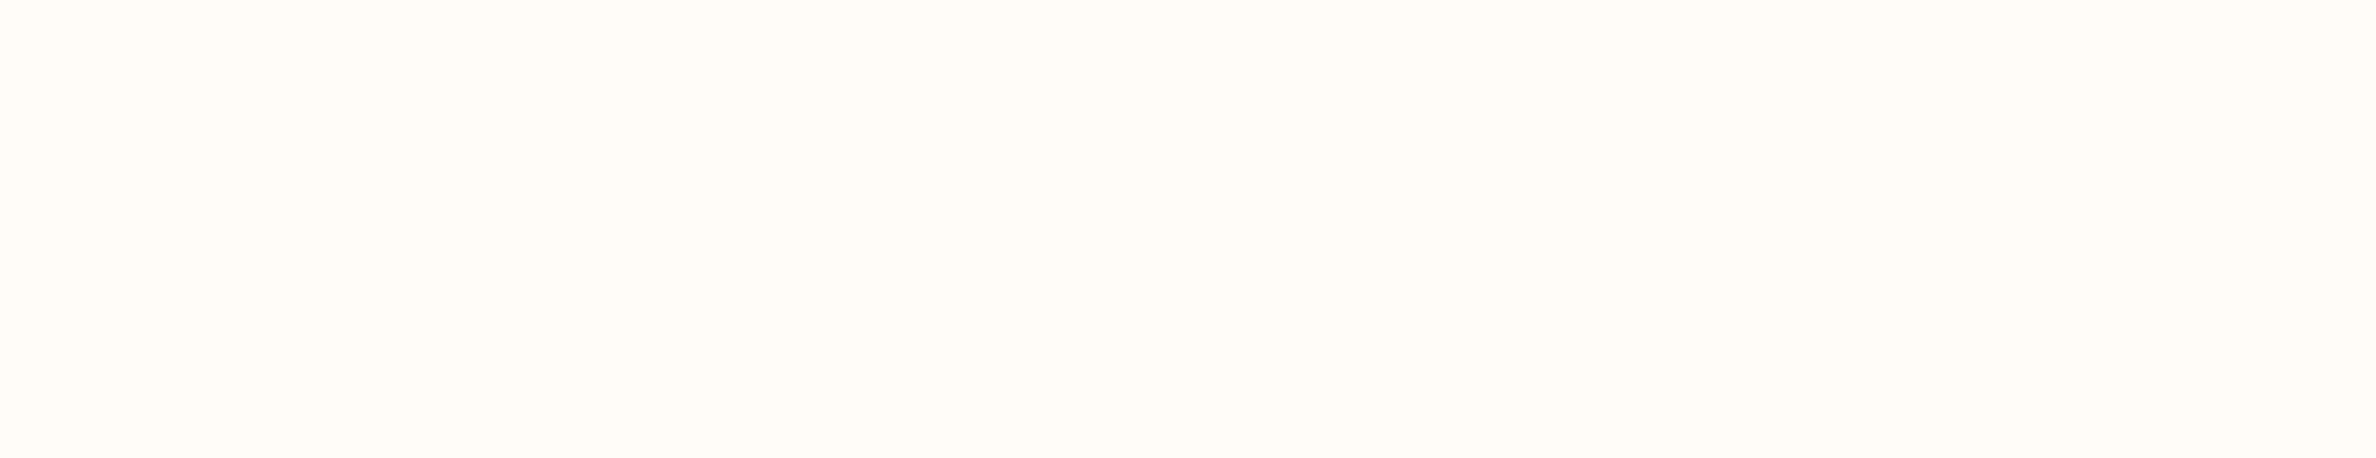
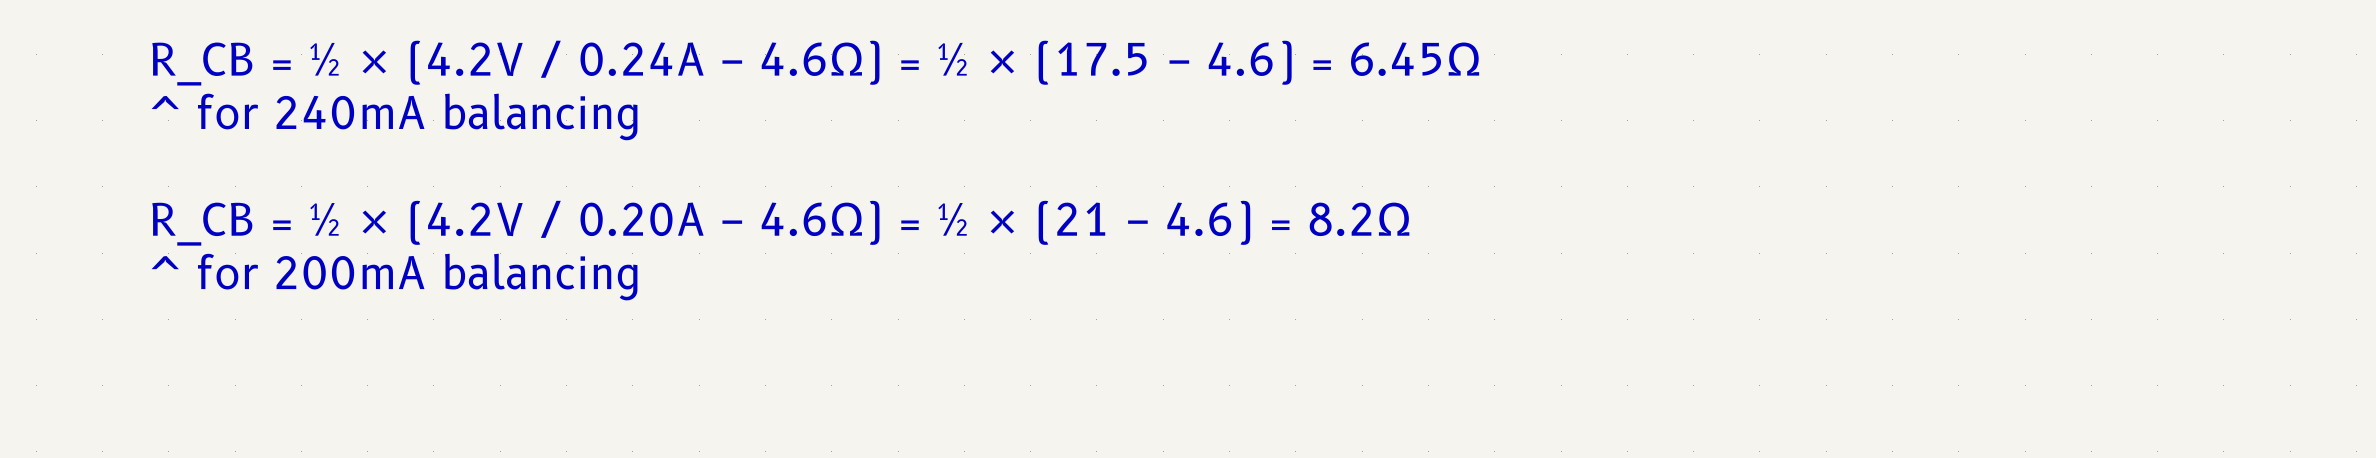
text: none -> R_CB = ½ × (4.2V / 0.24A − 4.6Ω) = ½ × (17.5 − 4.6) = 6.45Ω (815, 63)
text: none -> ^ for 240mA balancing (394, 116)
text: none -> R_CB = ½ × (4.2V / 0.20A − 4.6Ω) = ½ × (21 − 4.6) = 8.2Ω (780, 223)
text: none -> ^ for 200mA balancing (394, 277)

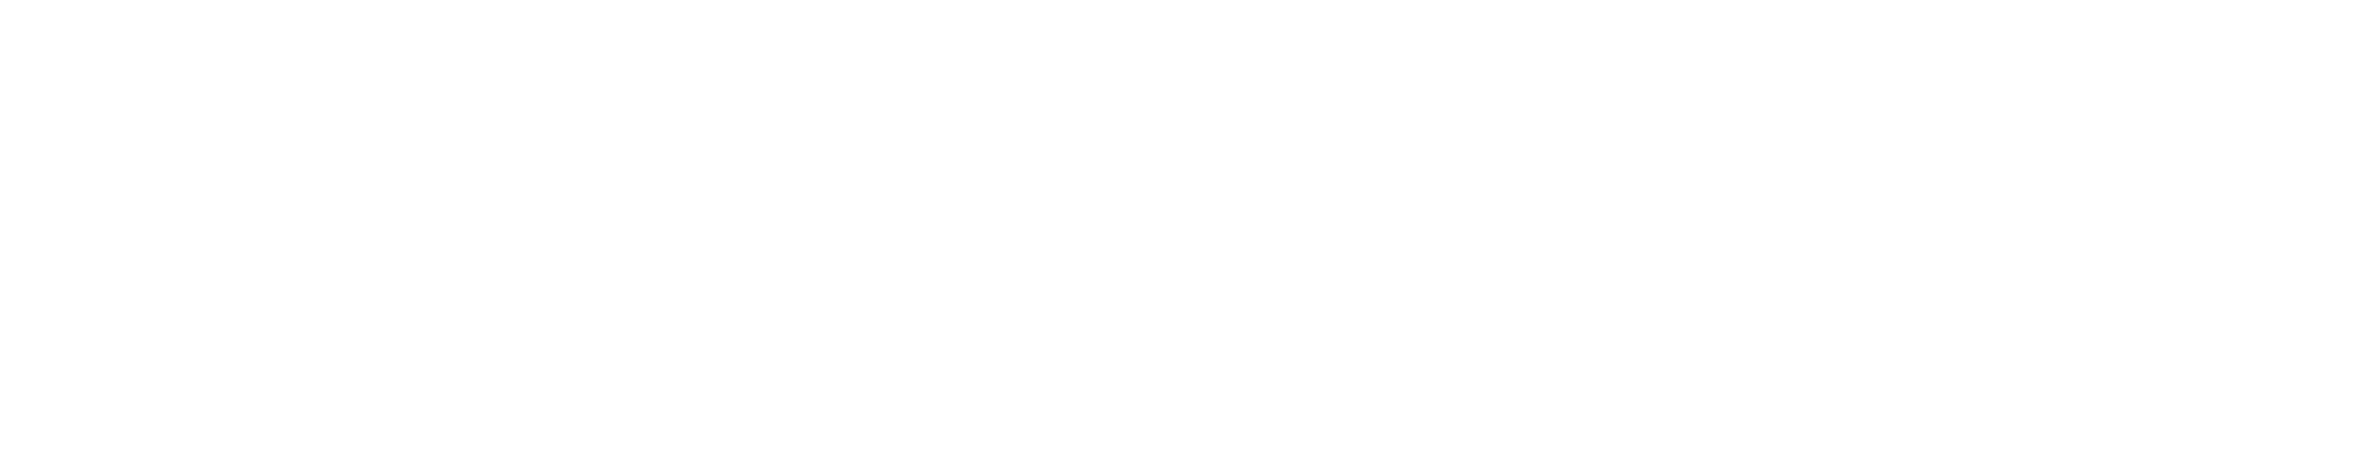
text: R_CB = ½ × (4.2V / 0.24A − 4.6Ω) = ½ × (17.5 − 4.6) = 6.45Ω (815, 63) -> none
text: ^ for 240mA balancing (394, 116) -> none
text: R_CB = ½ × (4.2V / 0.20A − 4.6Ω) = ½ × (21 − 4.6) = 8.2Ω (780, 223) -> none
text: ^ for 200mA balancing (394, 277) -> none

